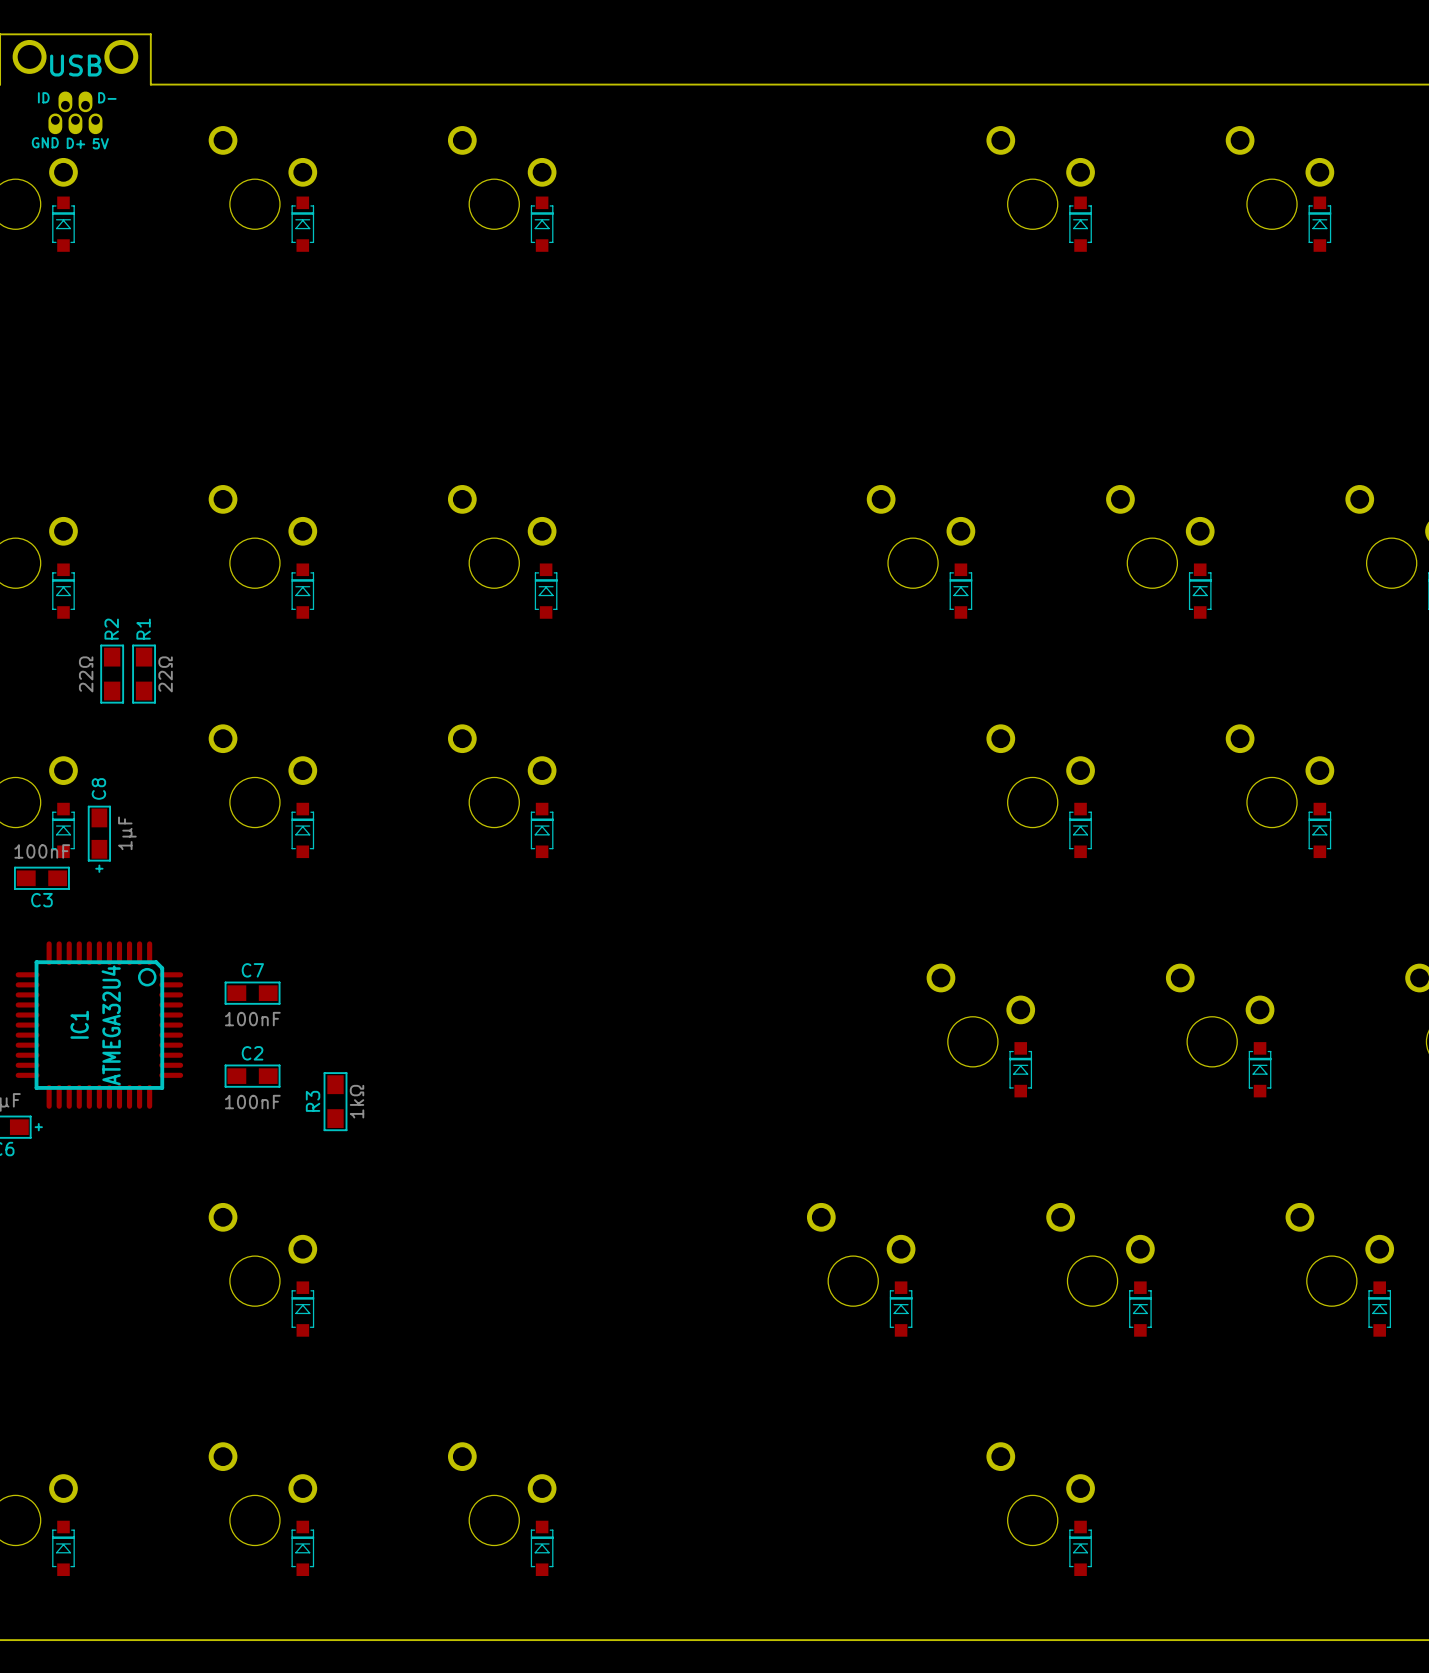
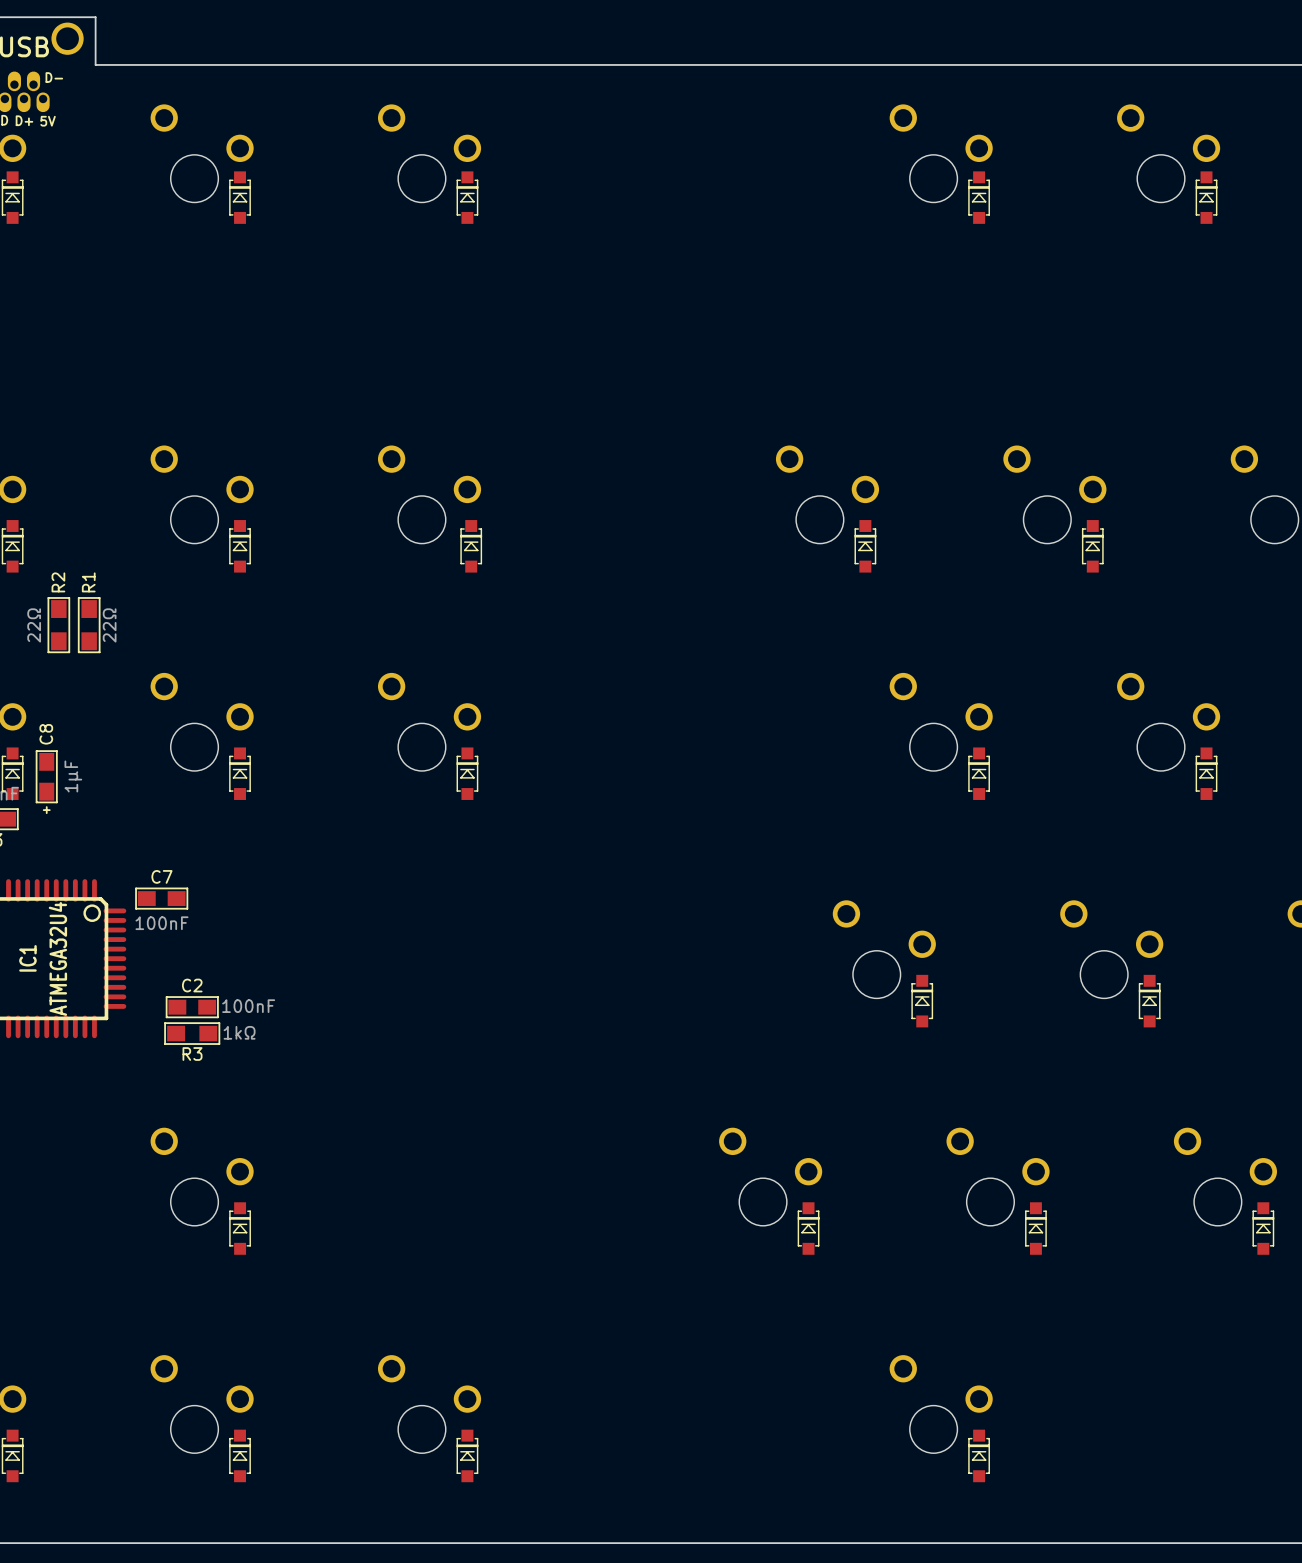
C7 position: (252, 993) -> (161, 898)
R3 name position: R3 (313, 1101) -> R3 (192, 1054)
R3 rotation: 0° (335, 1101) -> 90° clockwise (192, 1033)
R3 position: (335, 1101) -> (192, 1033)
R3 value position: 1kΩ (357, 1101) -> 1kΩ (239, 1032)
C2 value position: 100nF (252, 1102) -> 100nF (248, 1006)

